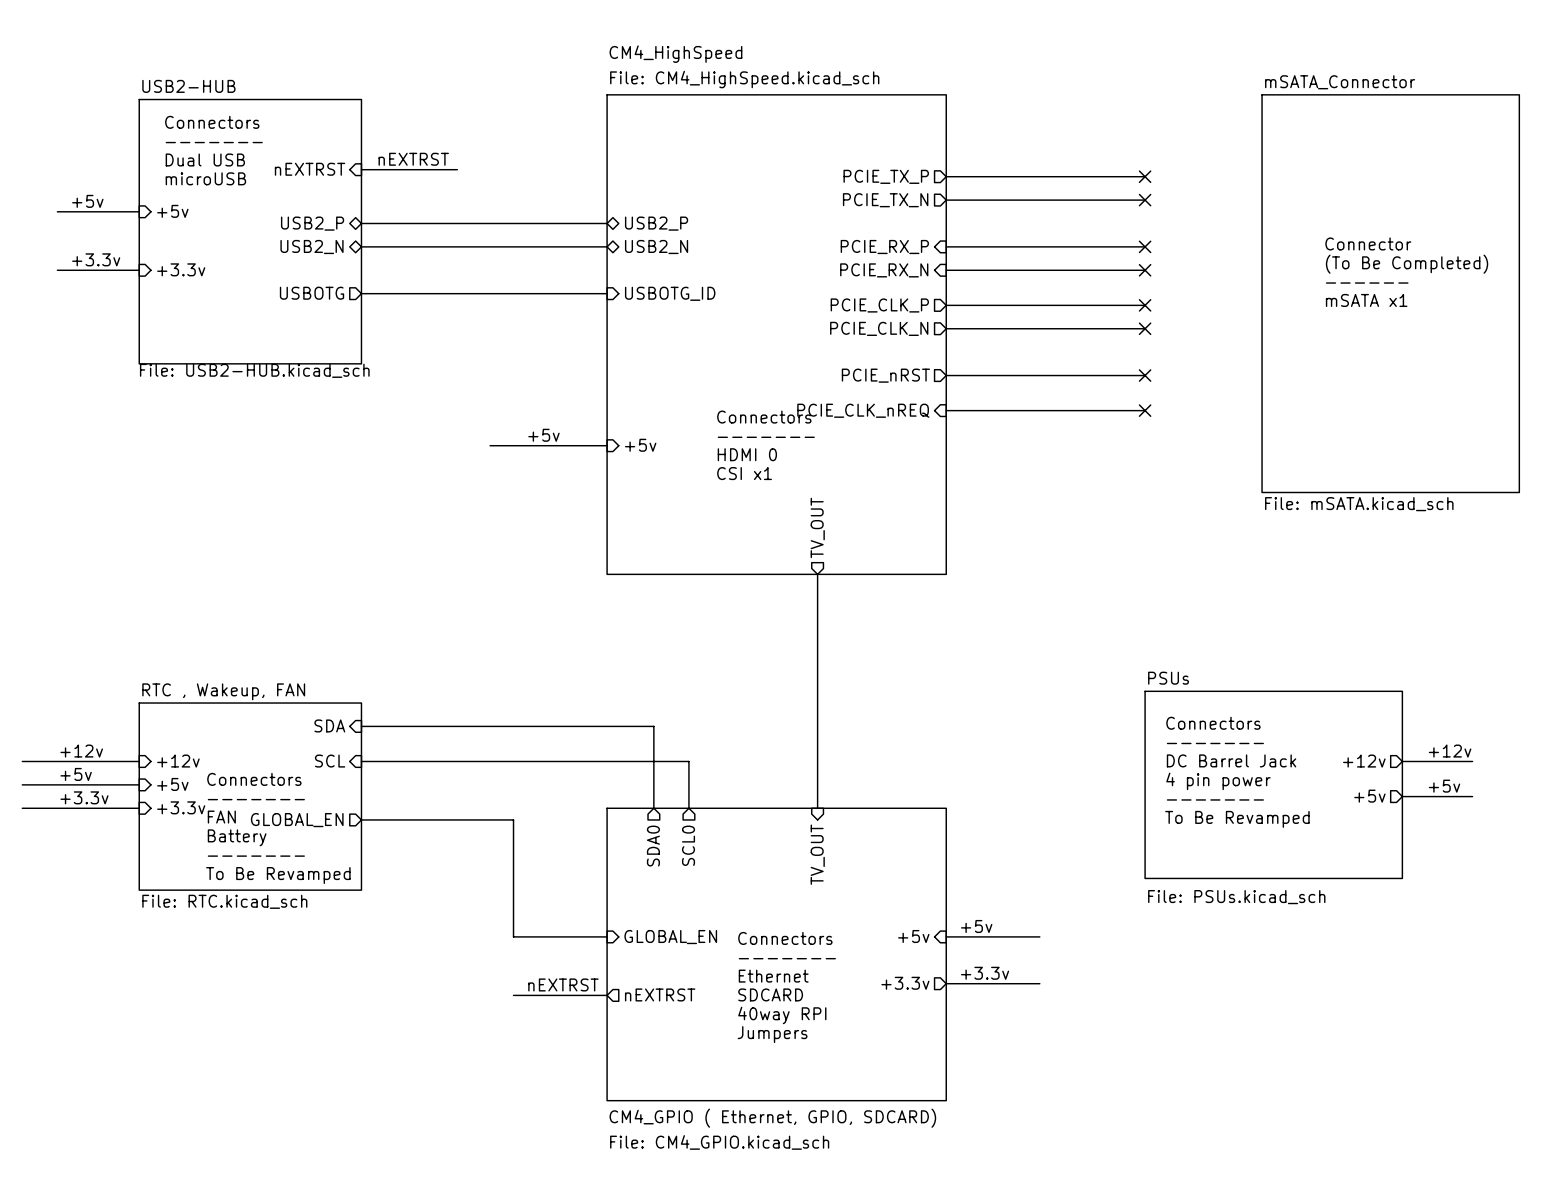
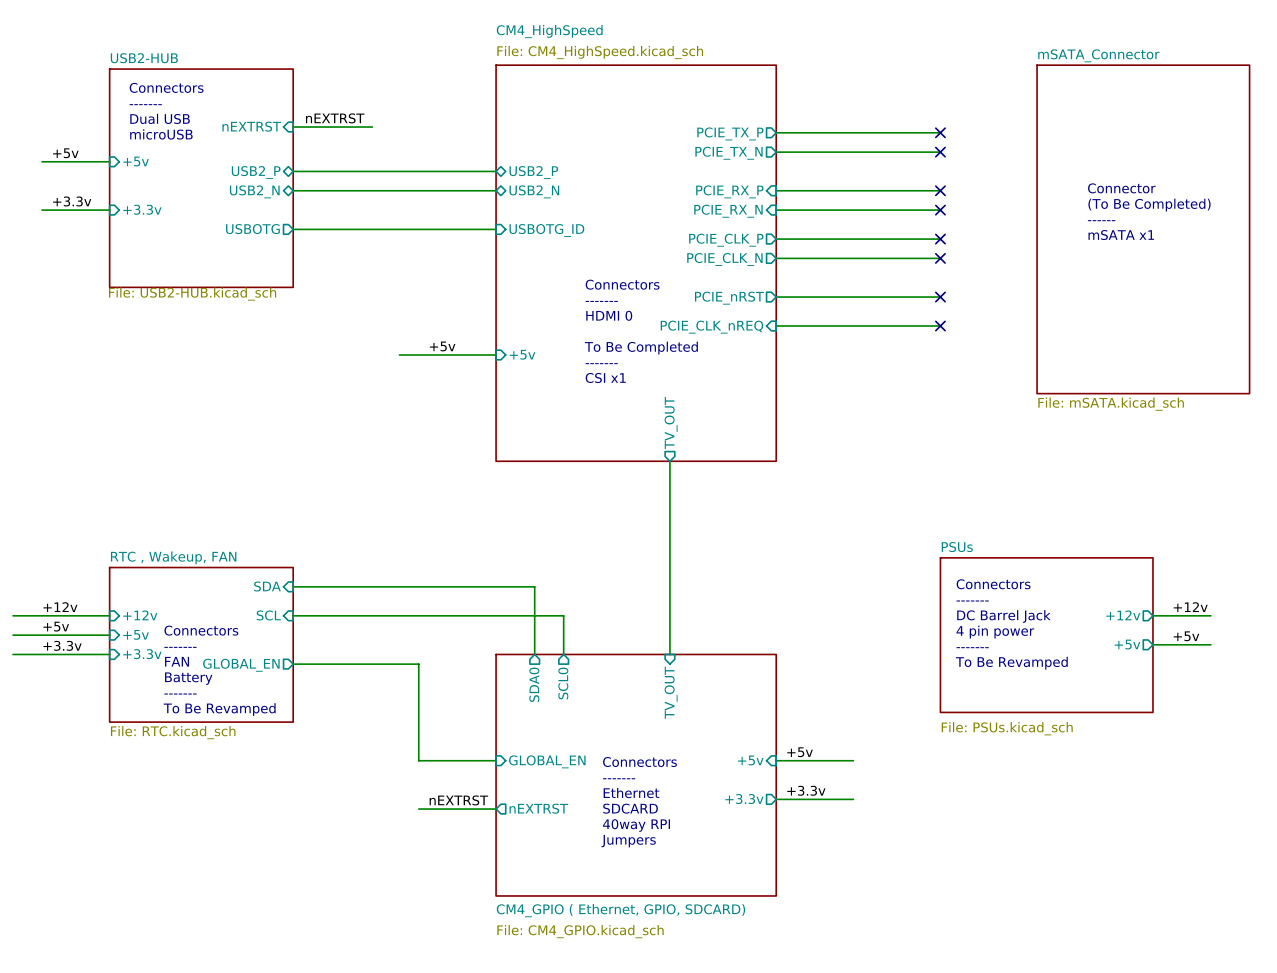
text: none -> ------- (601, 301)
text: none -> HDMI 0 (609, 315)
text position: Connectors (764, 417) -> Connectors (622, 284)
text: ------- (766, 437) -> To Be Completed (641, 348)
text: HDMI 0 (747, 454) -> ------- (601, 363)

